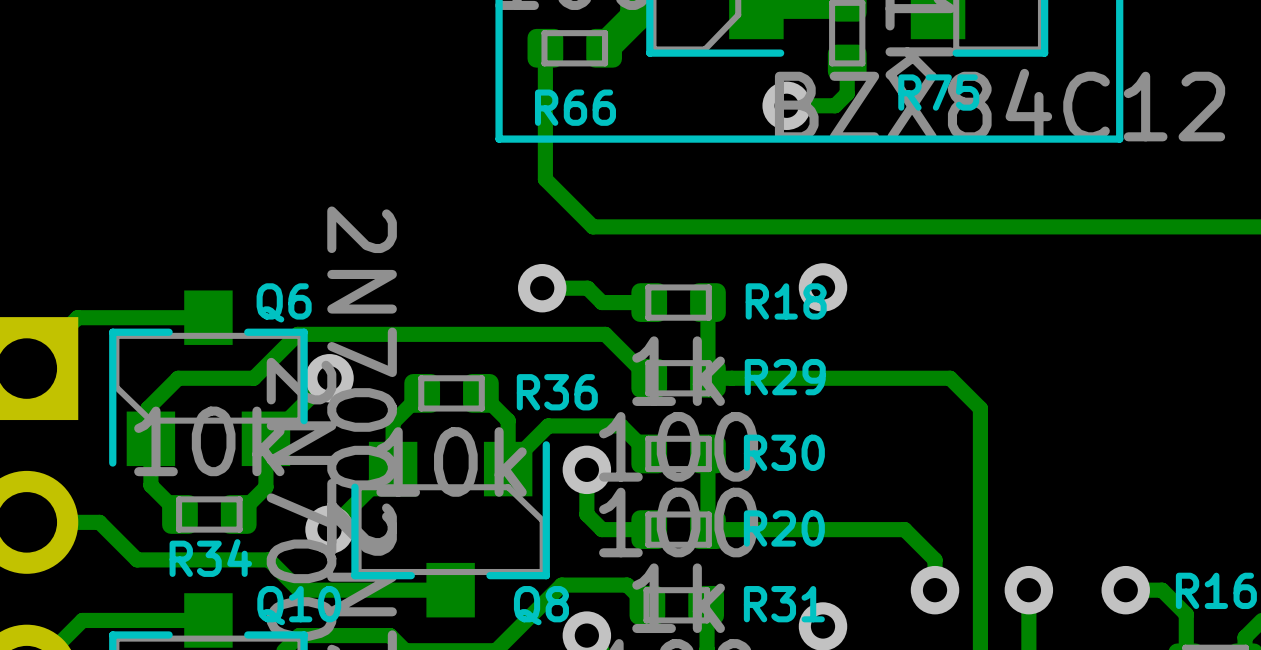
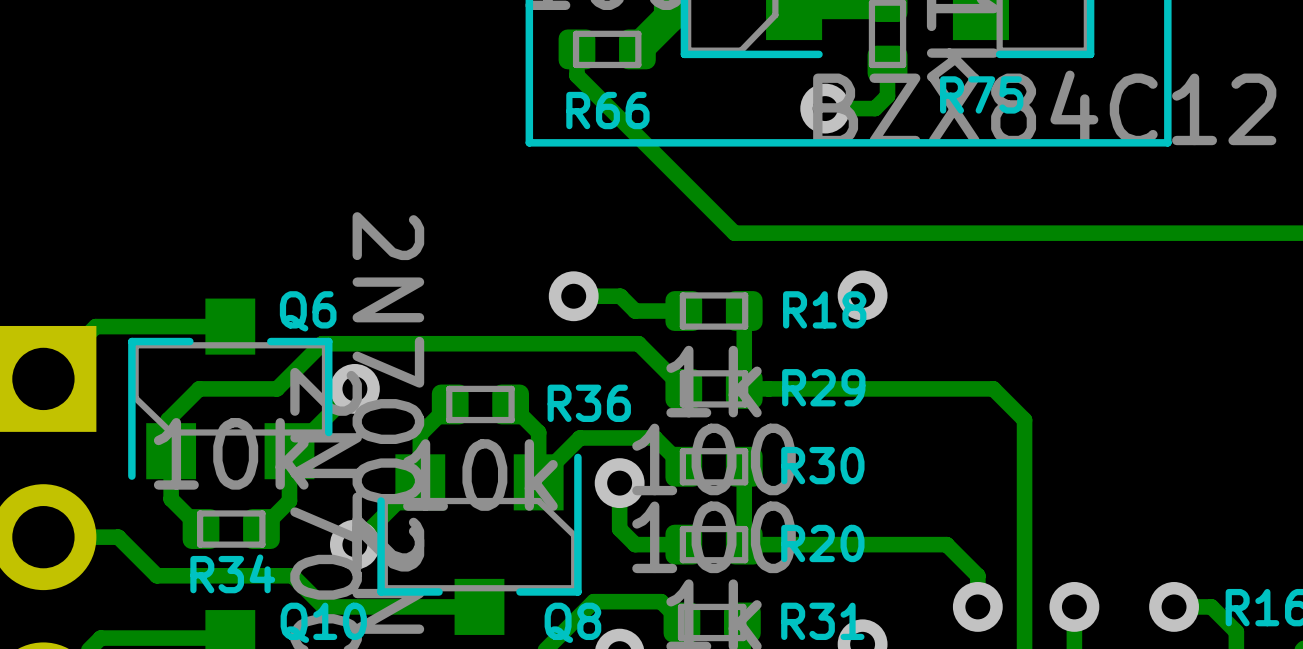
track: (545, 73) (545, 179) (592, 226) (698, 226) -> (576, 75) (734, 233)

